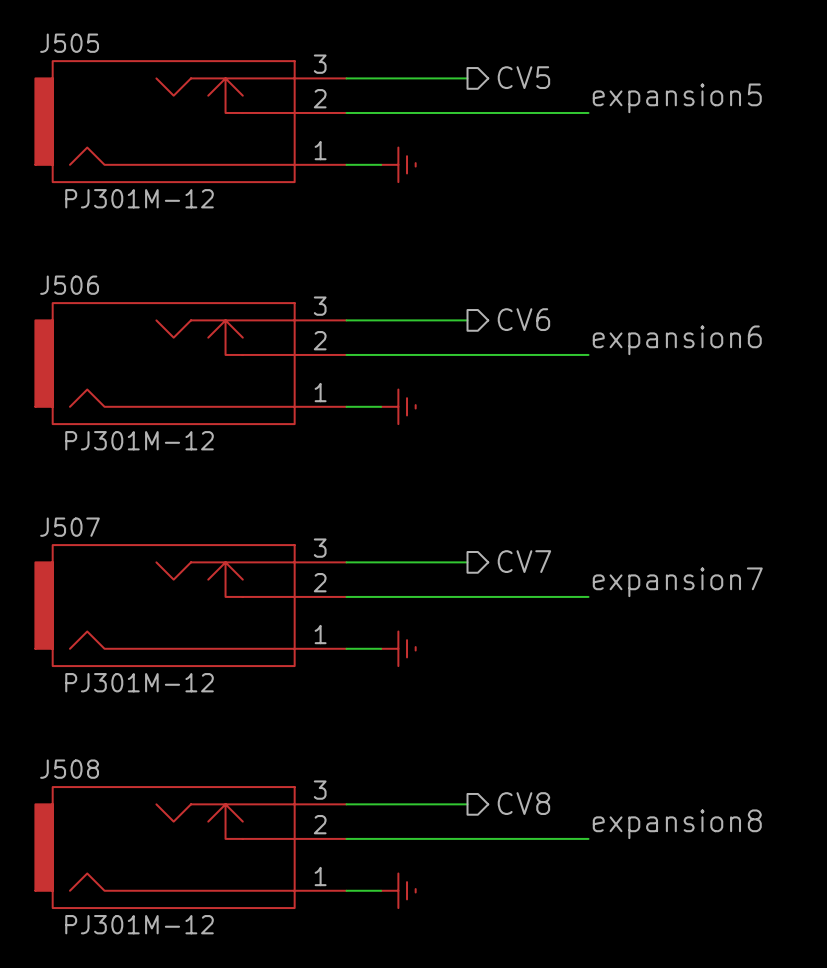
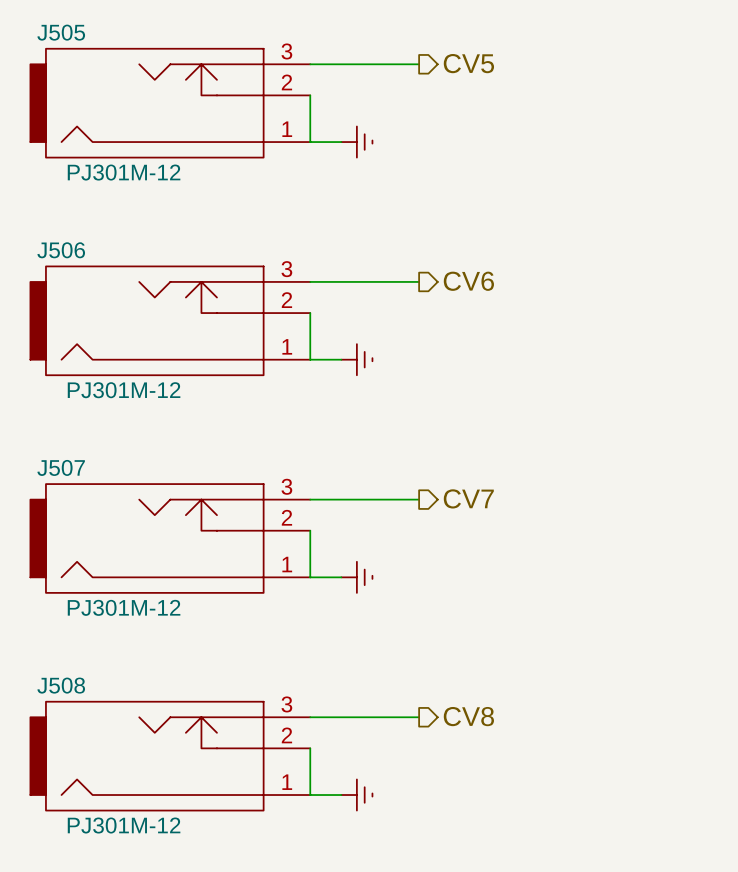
label: expansion5 (677, 98) -> none
wire: (346, 112) (588, 112) -> (310, 95) (310, 142)
label: expansion6 (677, 340) -> none
wire: (346, 354) (588, 354) -> (310, 313) (310, 359)
label: expansion7 (677, 582) -> none
wire: (346, 596) (588, 596) -> (310, 530) (310, 577)
label: expansion8 (677, 824) -> none
wire: (346, 838) (588, 838) -> (310, 748) (310, 795)

